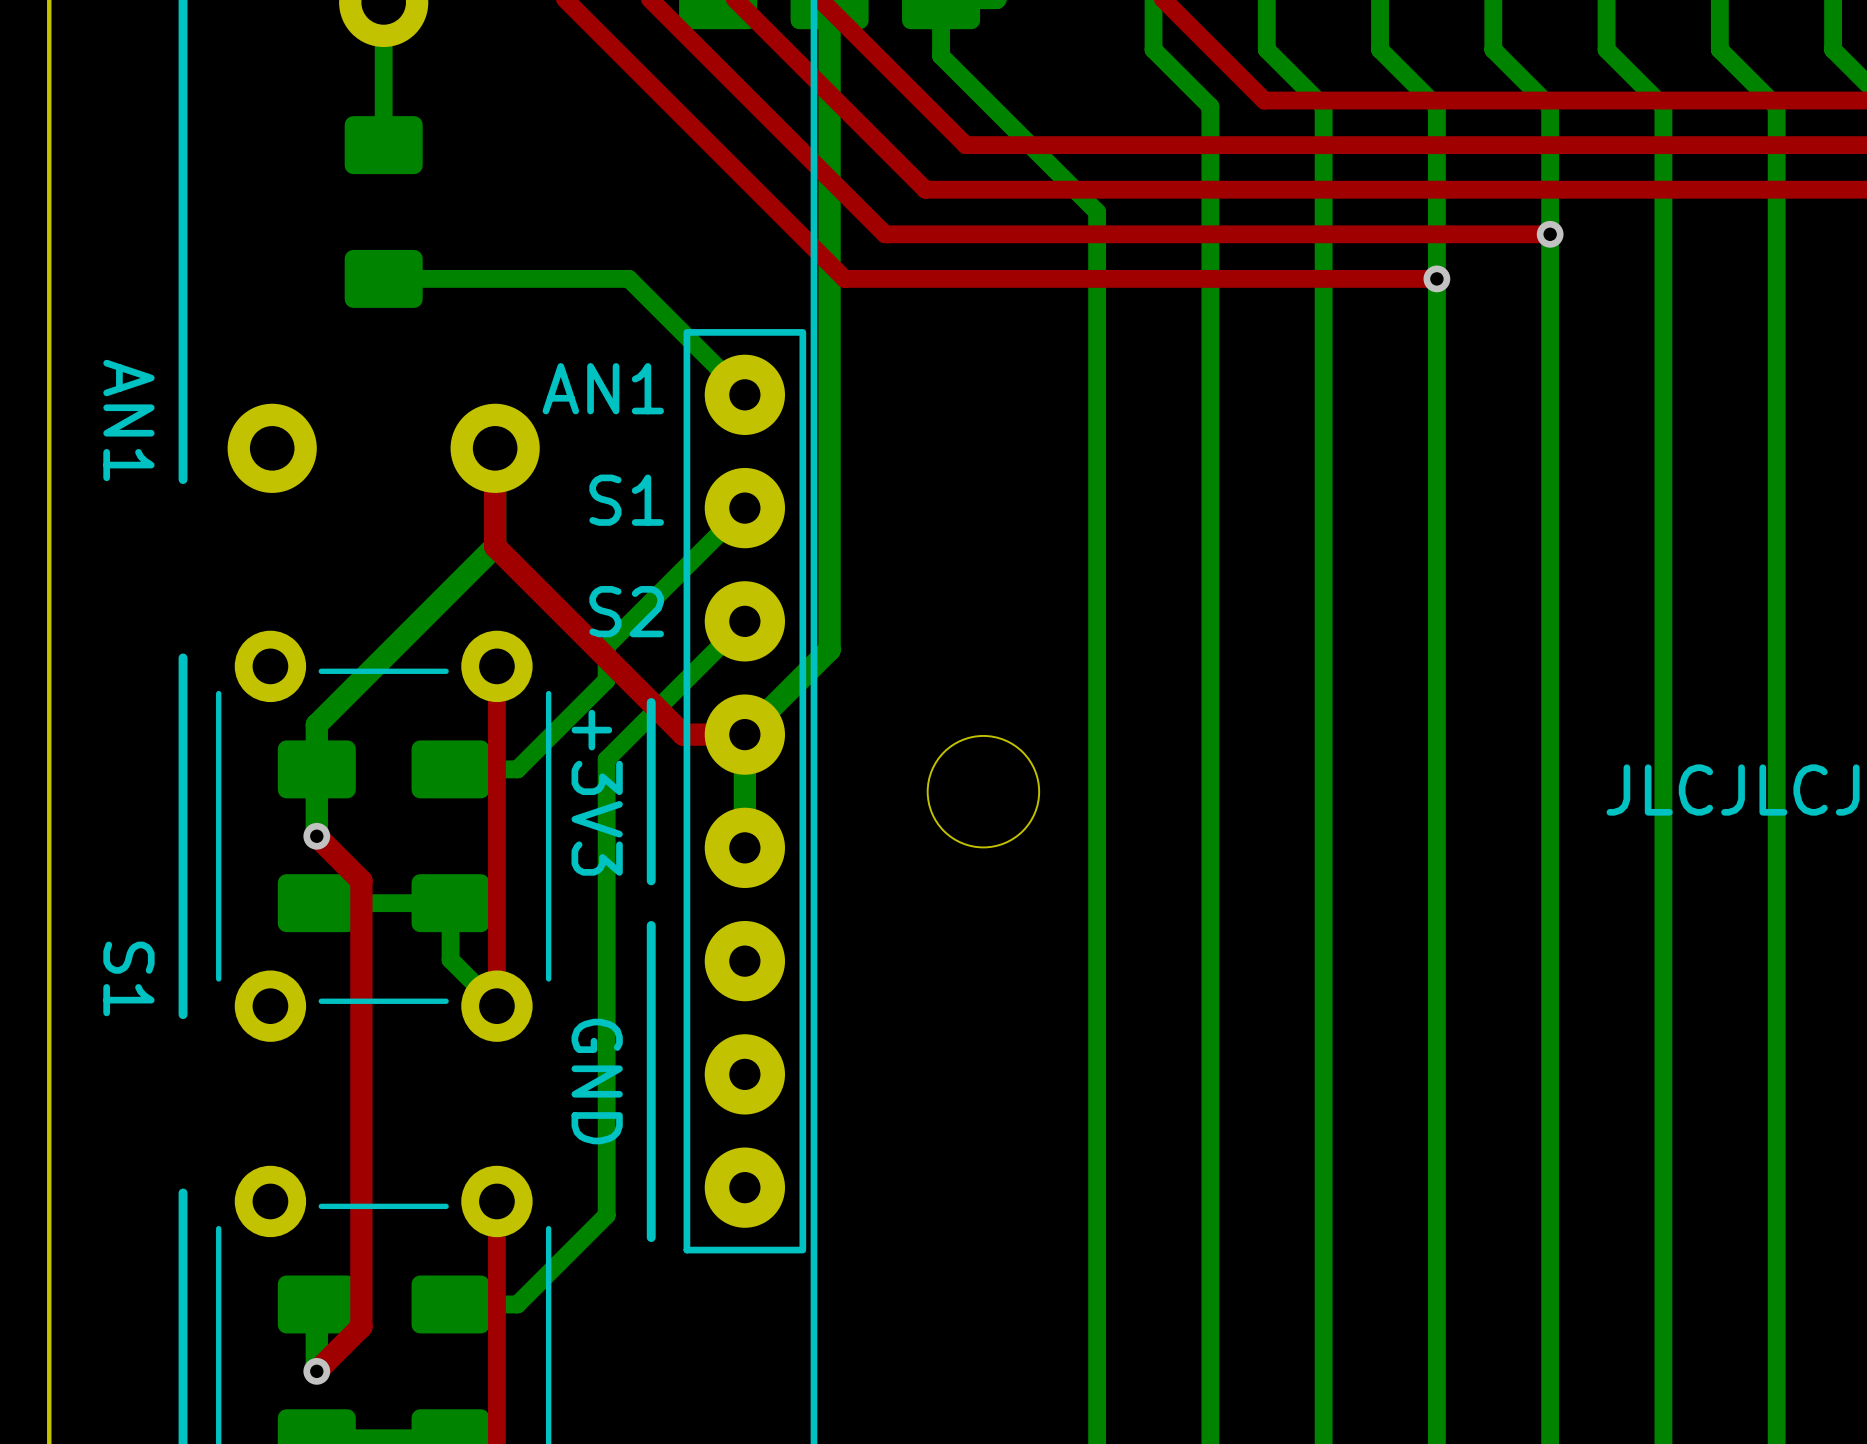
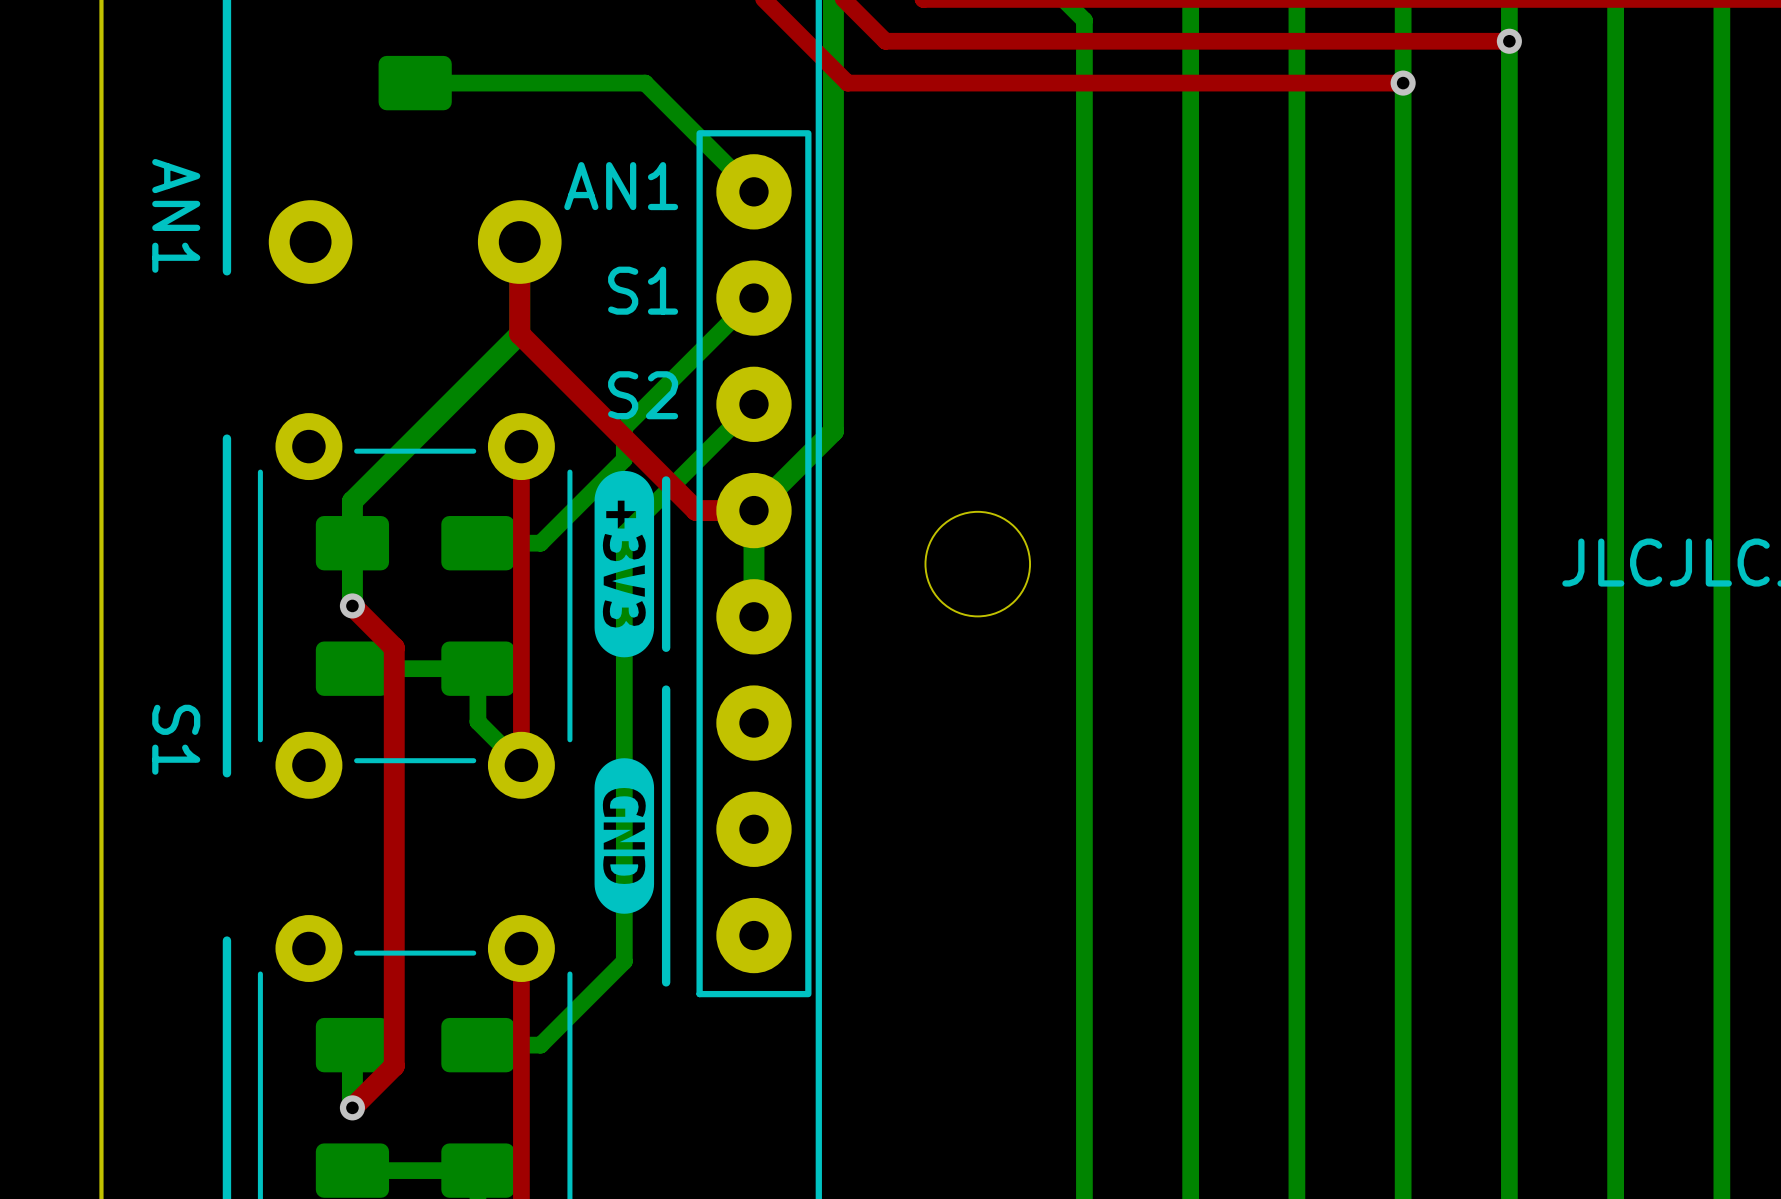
drawing: none -> [594, 470, 655, 658]
text: +3V3 (597, 792) -> none
drawing: none -> [594, 758, 655, 914]
text: GND (597, 1081) -> none

